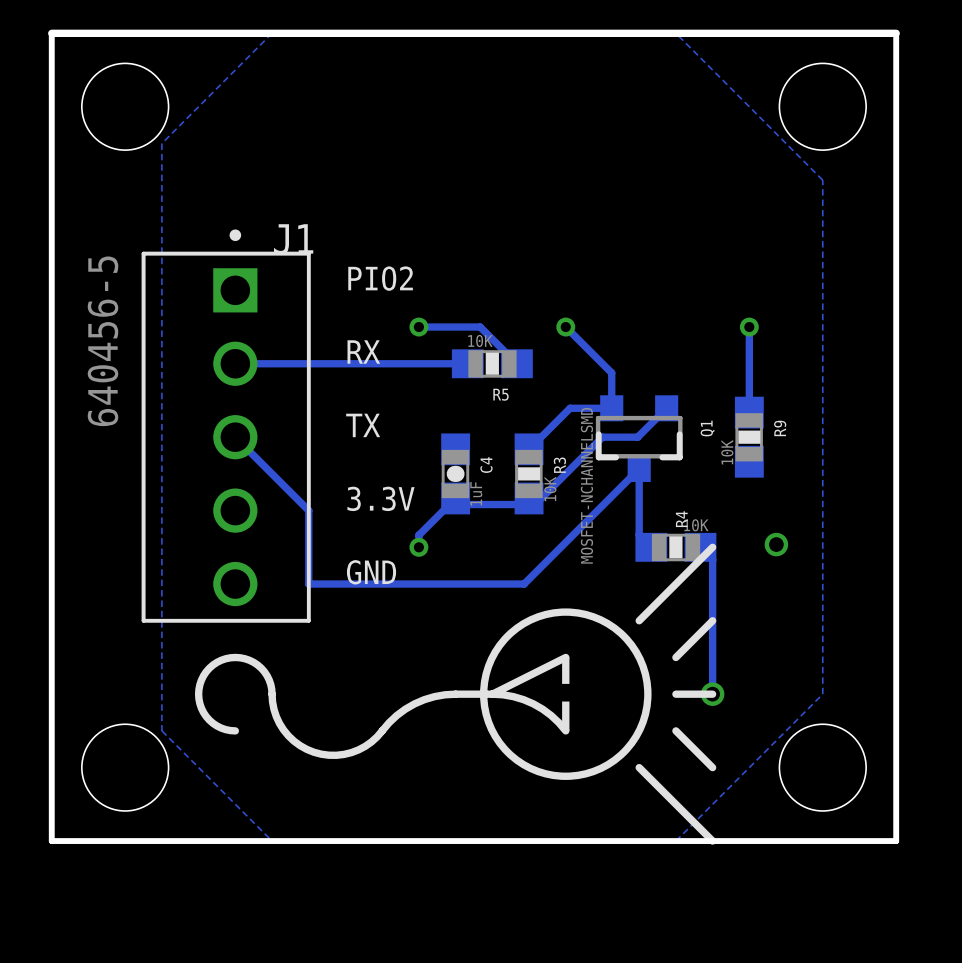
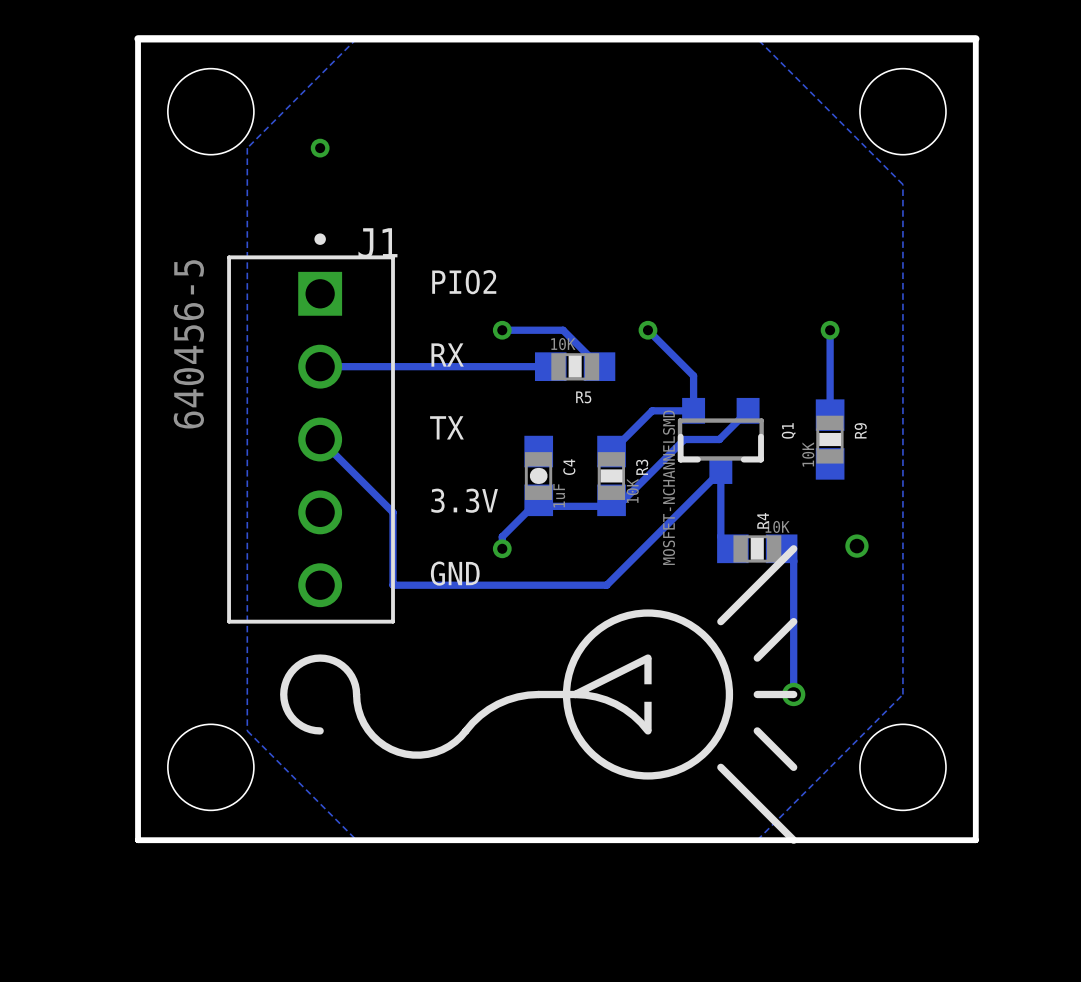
via: none -> (320, 148)

